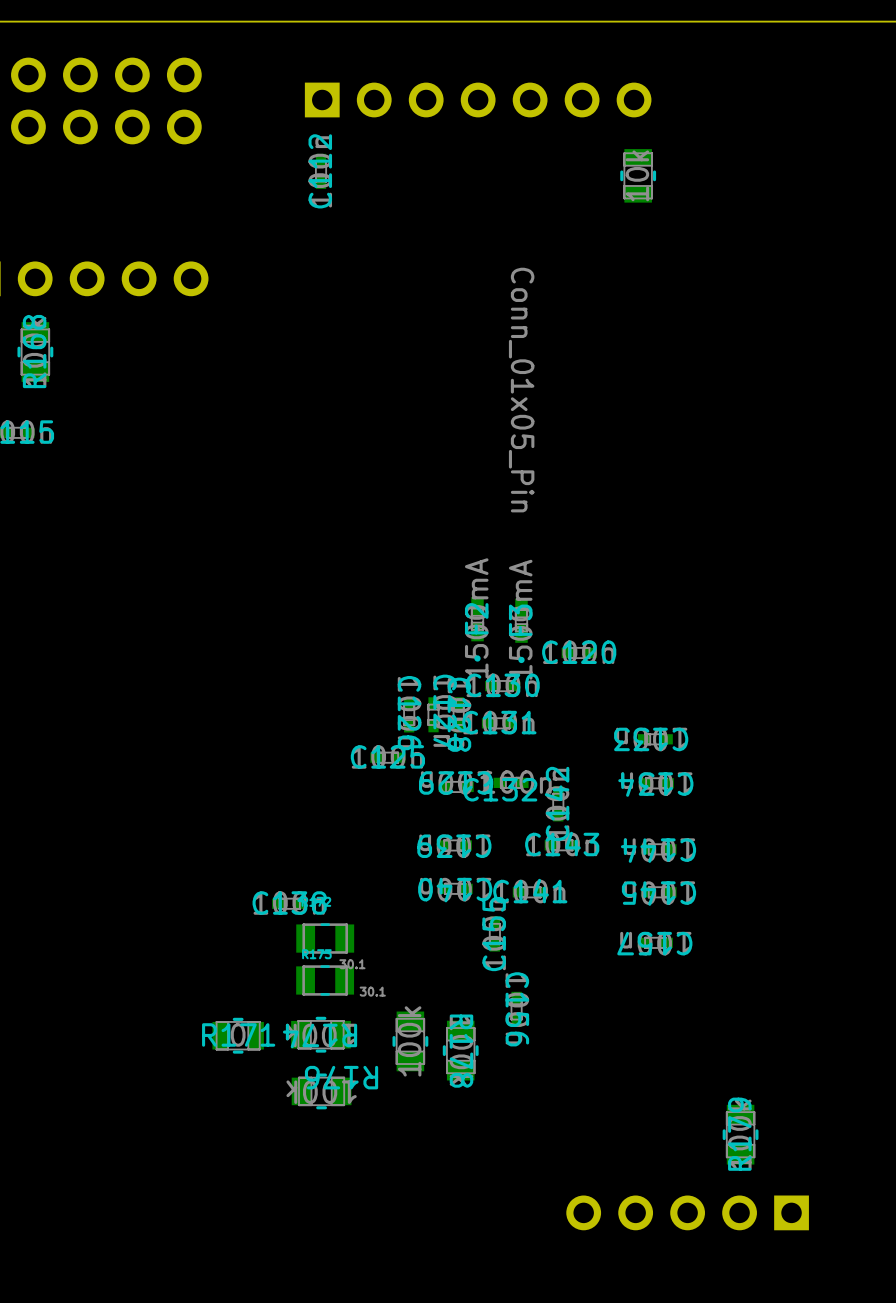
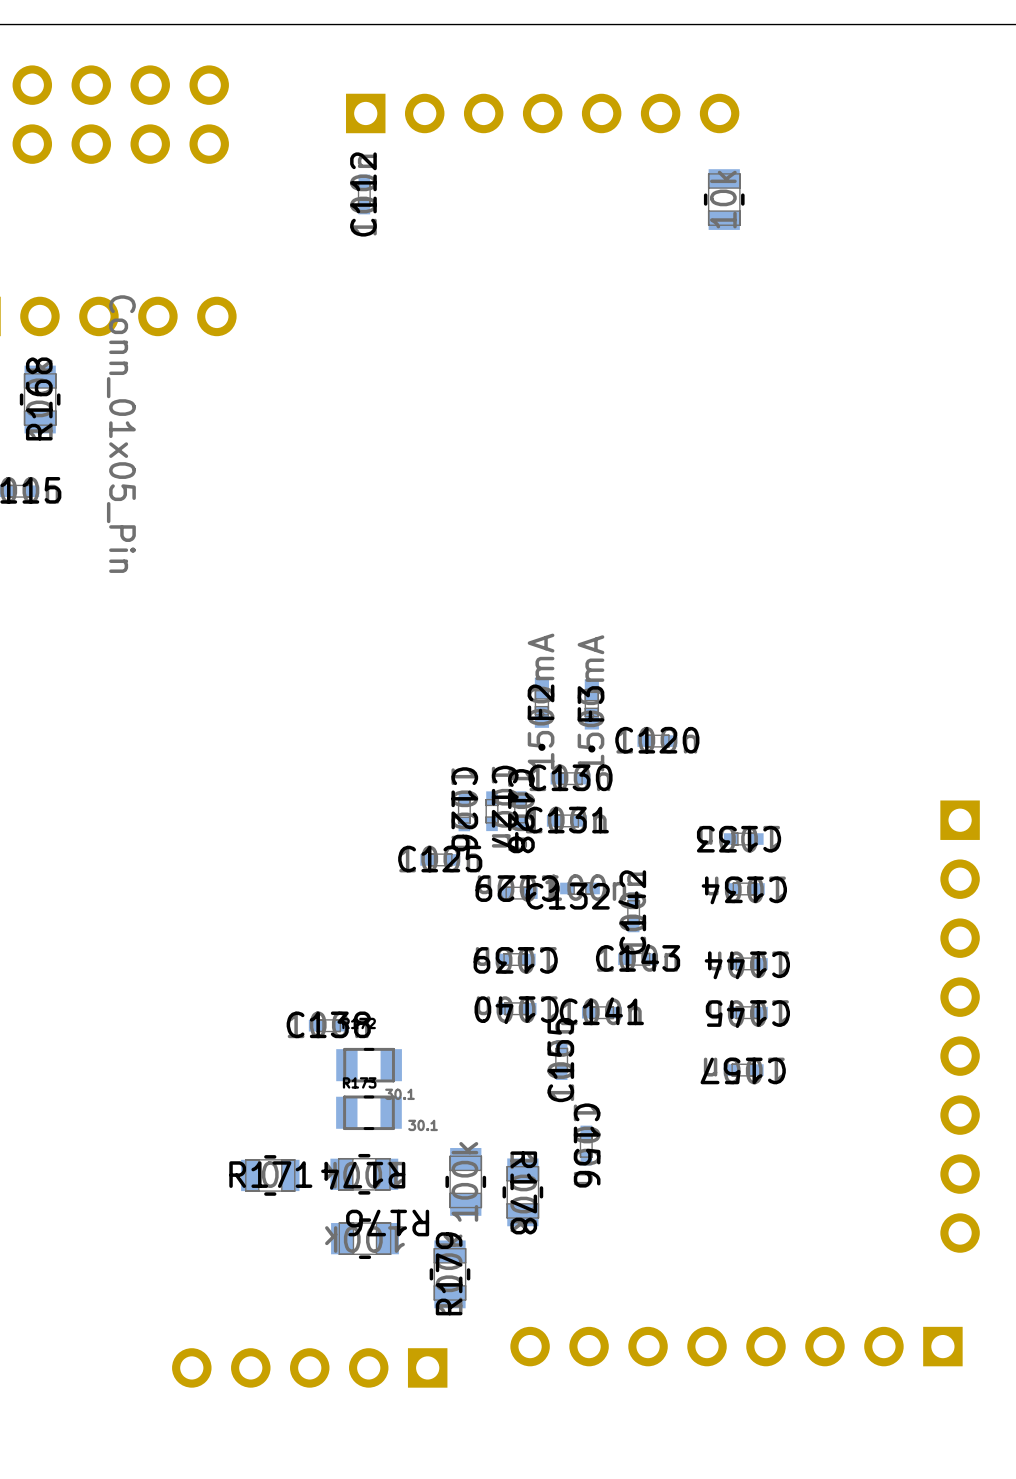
part: none -> (960, 1026)
R179 position: (740, 1134) -> (449, 1274)
part: none -> (736, 1346)
part position: (687, 1212) -> (309, 1367)

